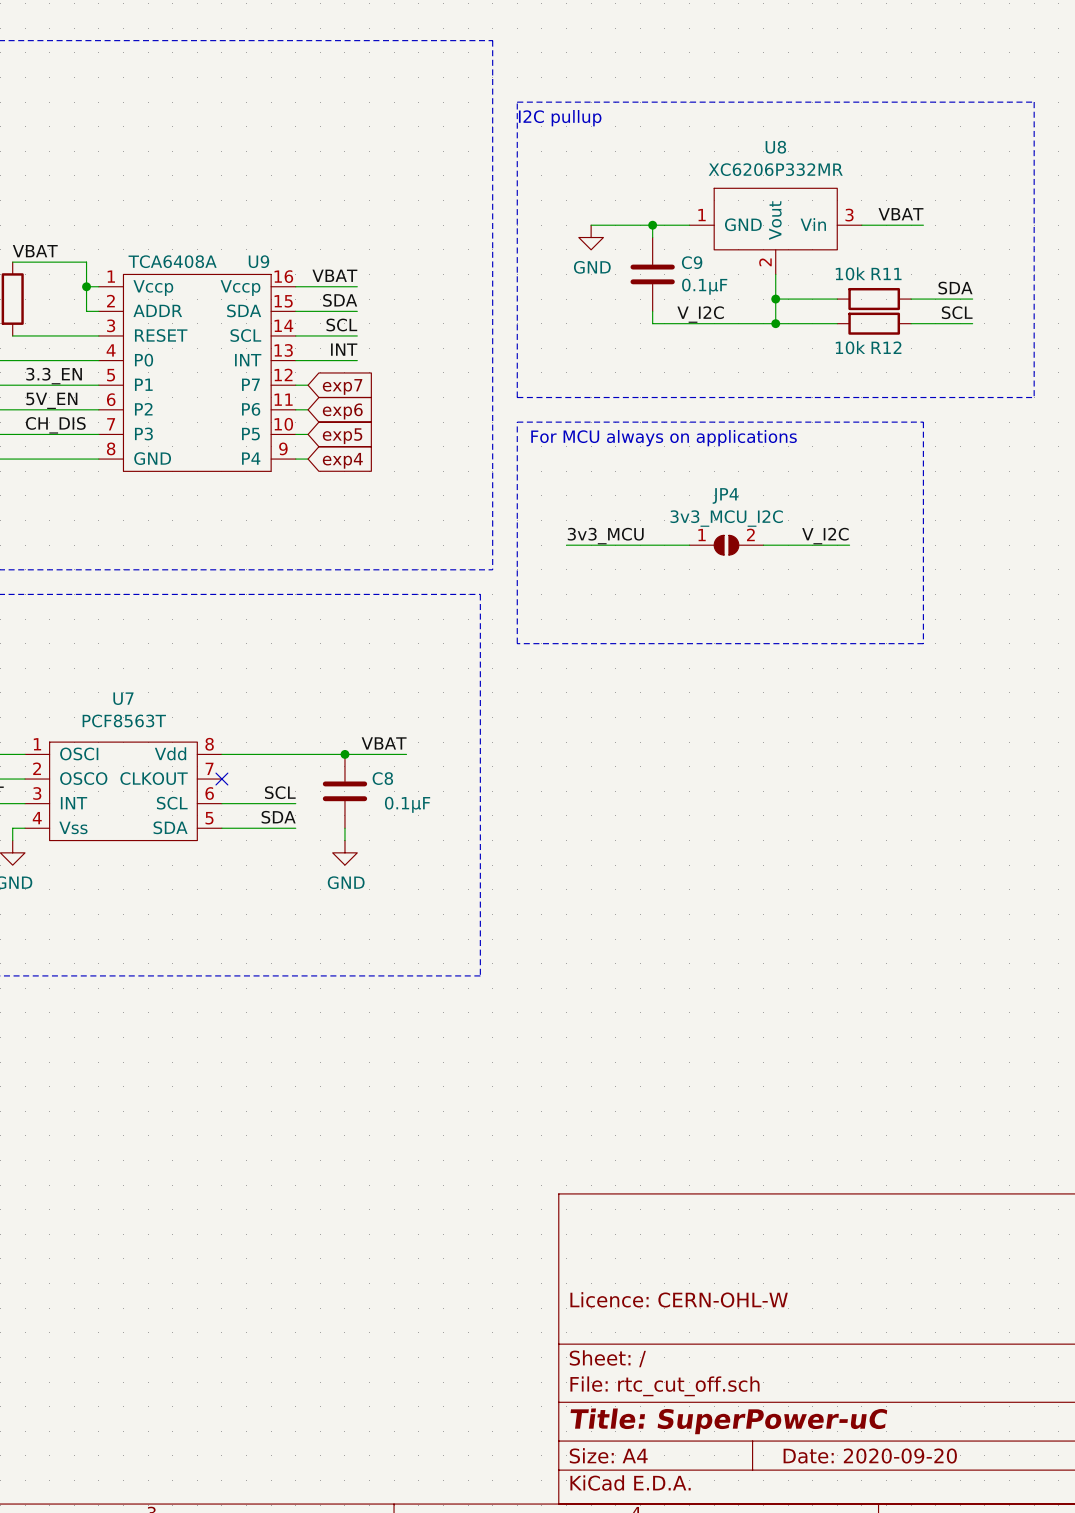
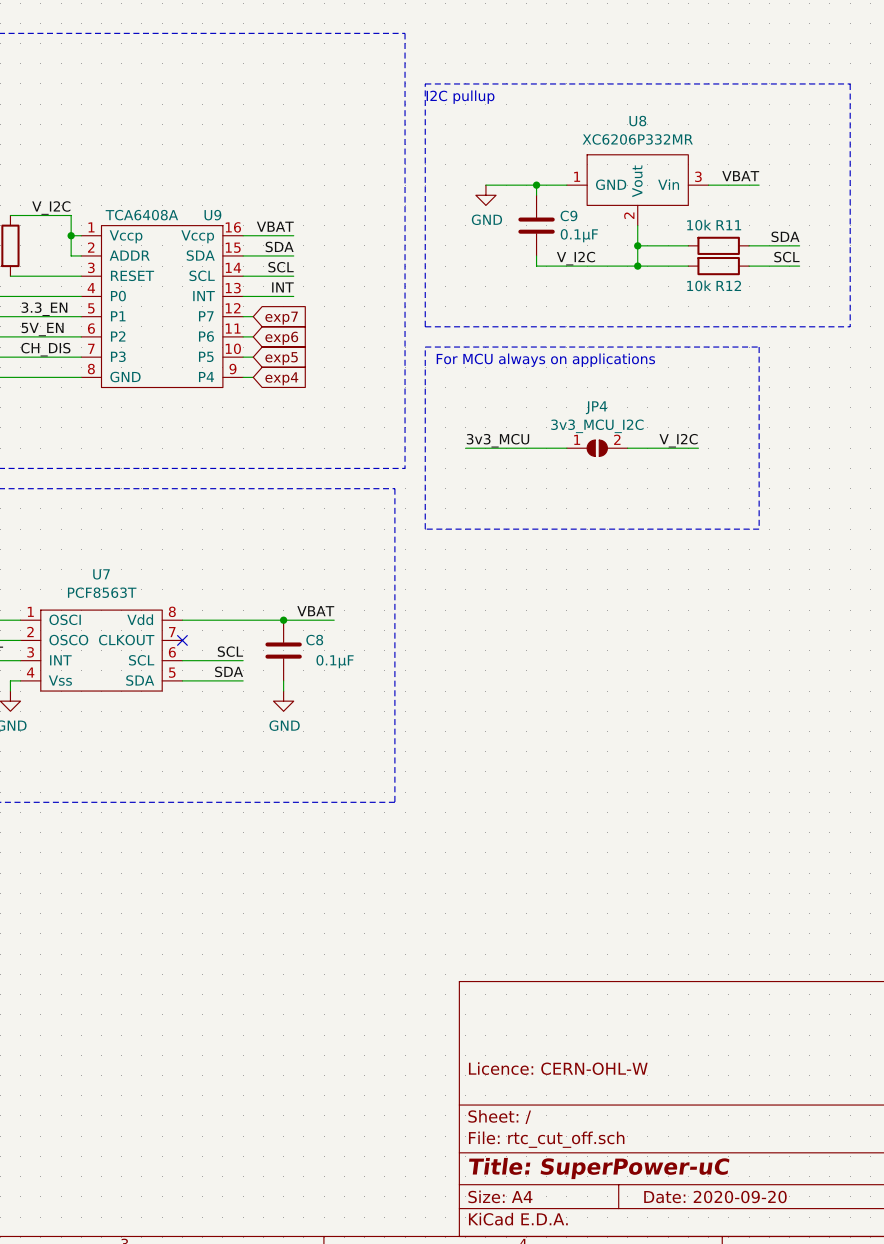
label: VBAT (35, 251) -> none
label: none -> V_I2C (51, 208)

